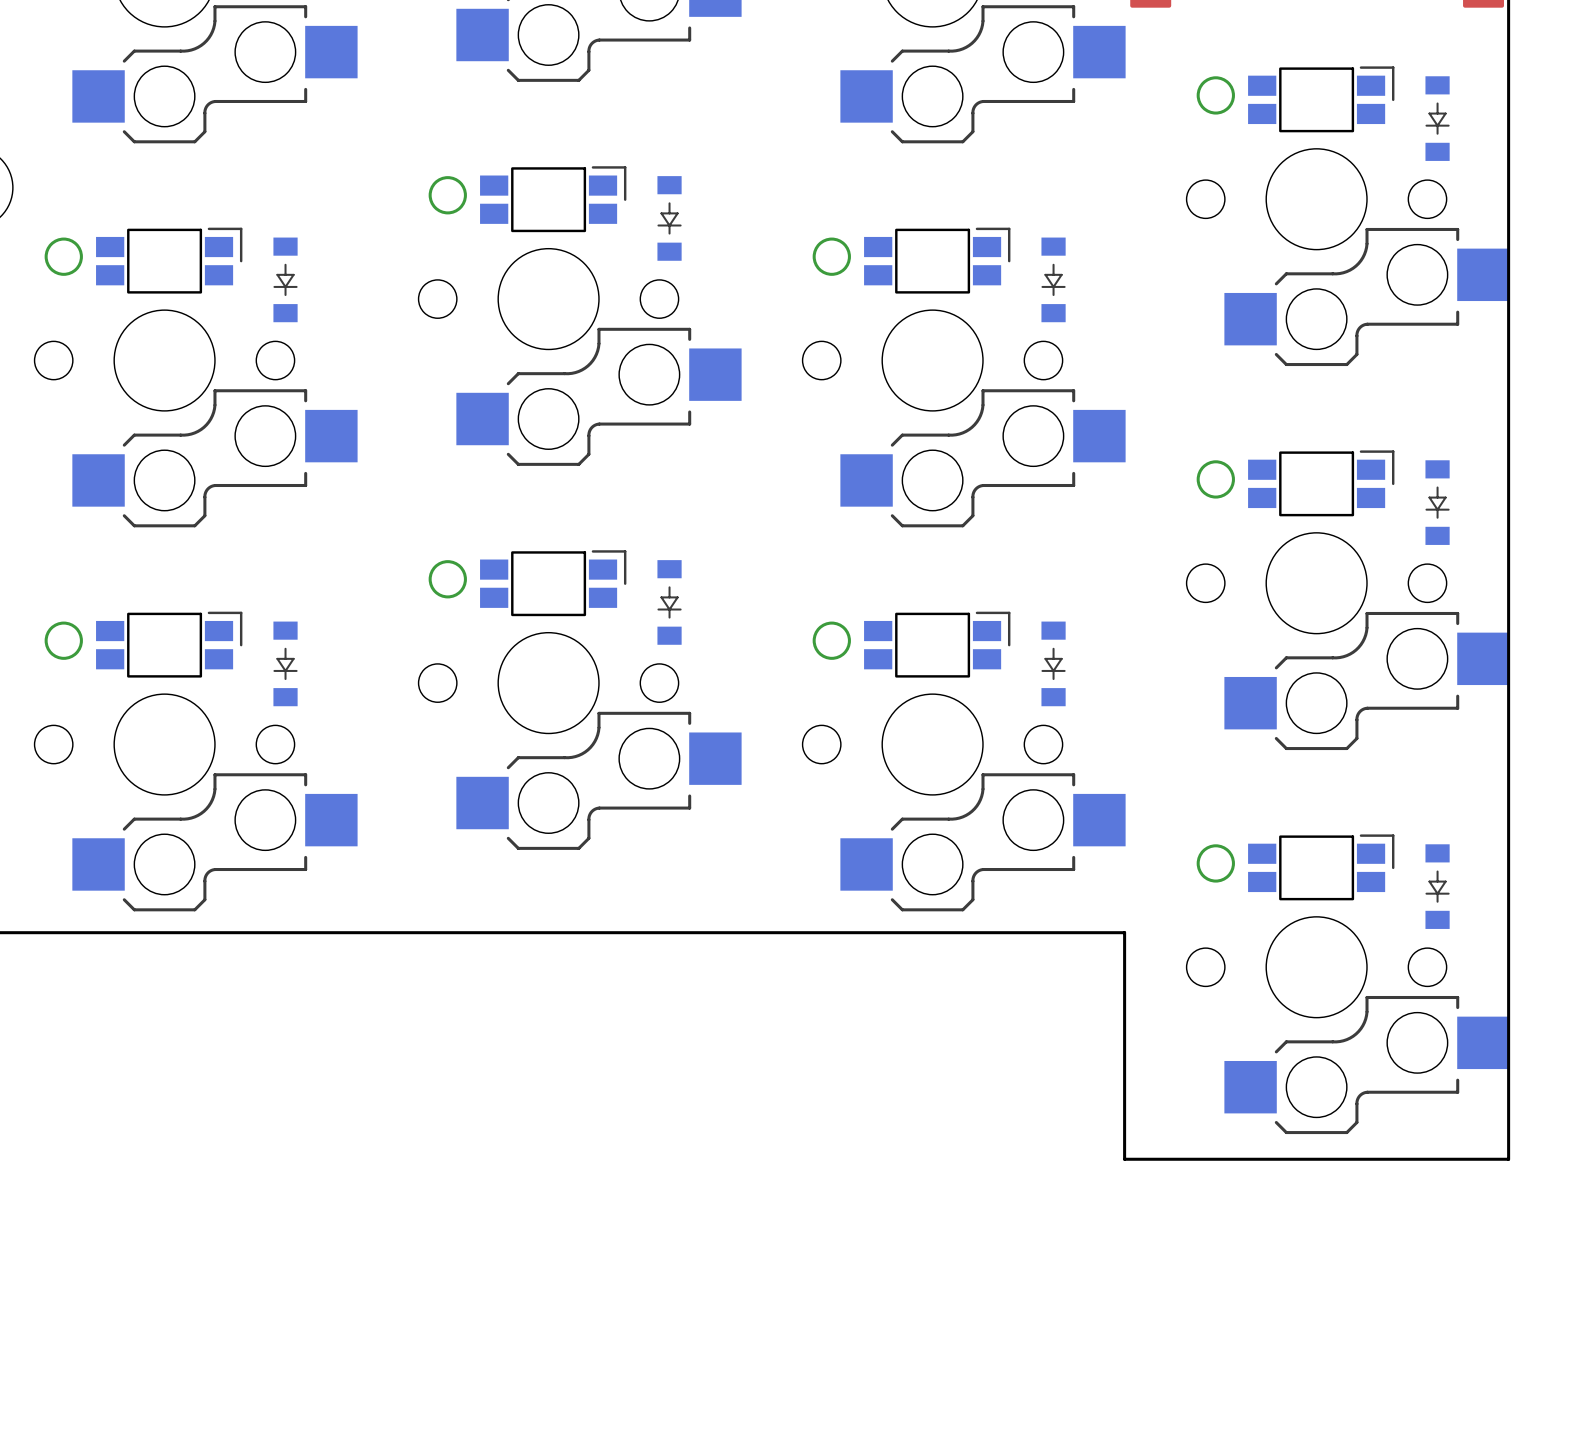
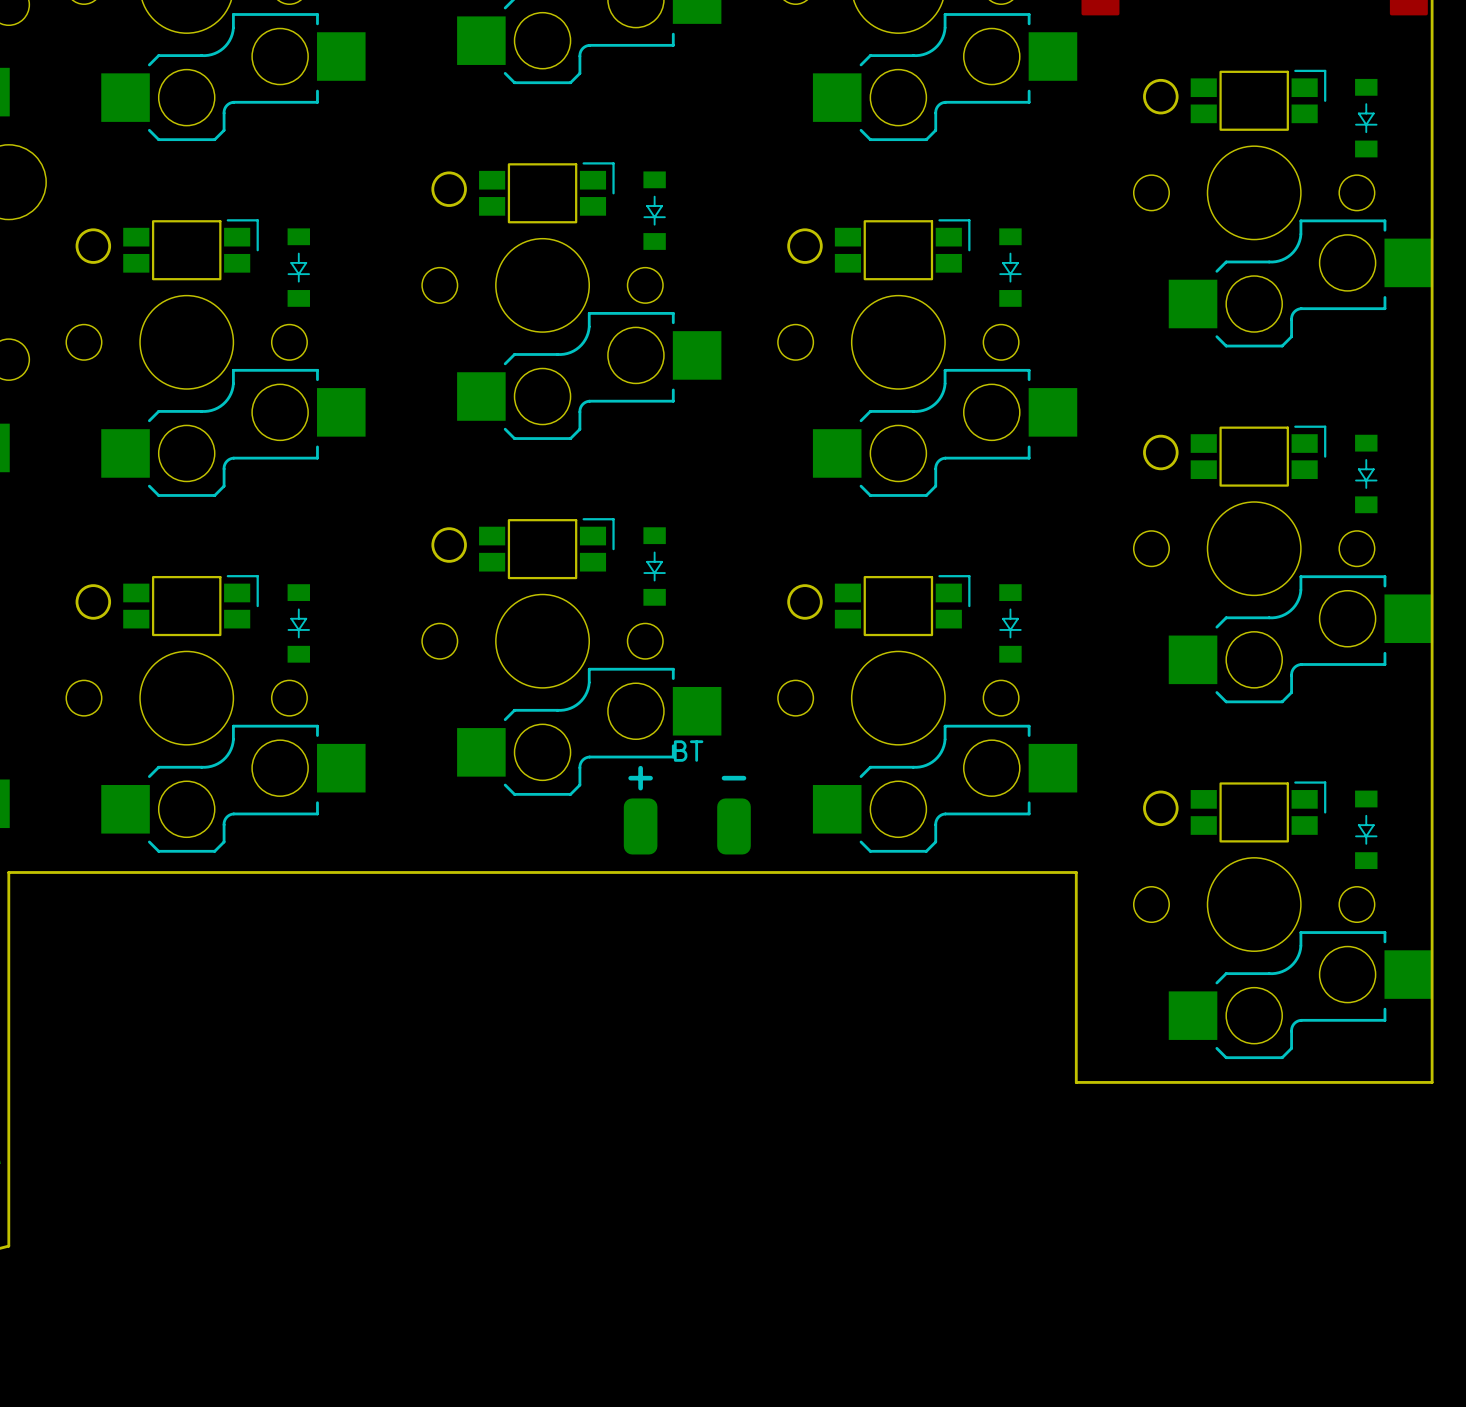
BT: none -> (687, 826)

